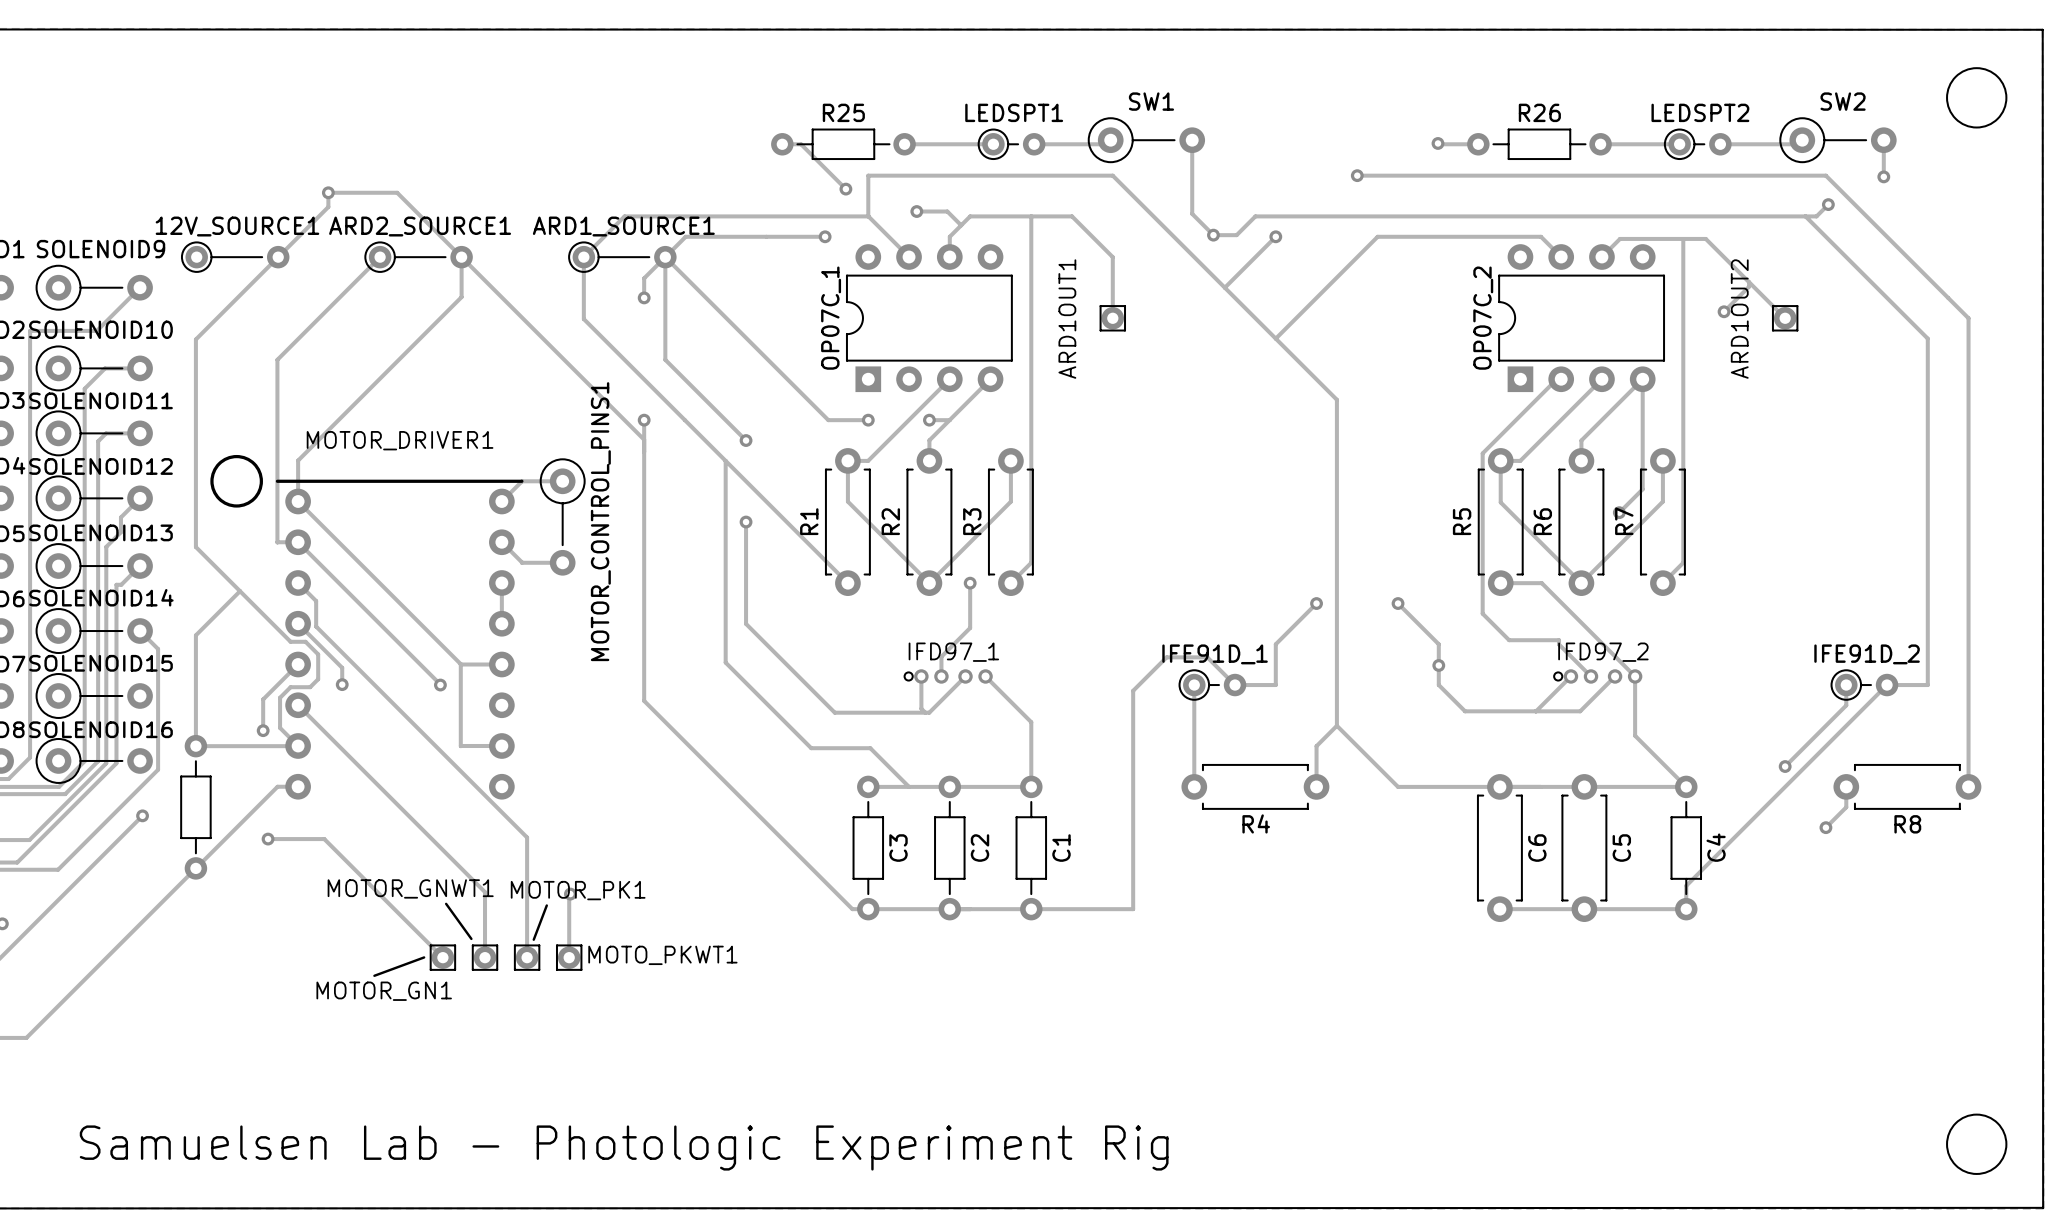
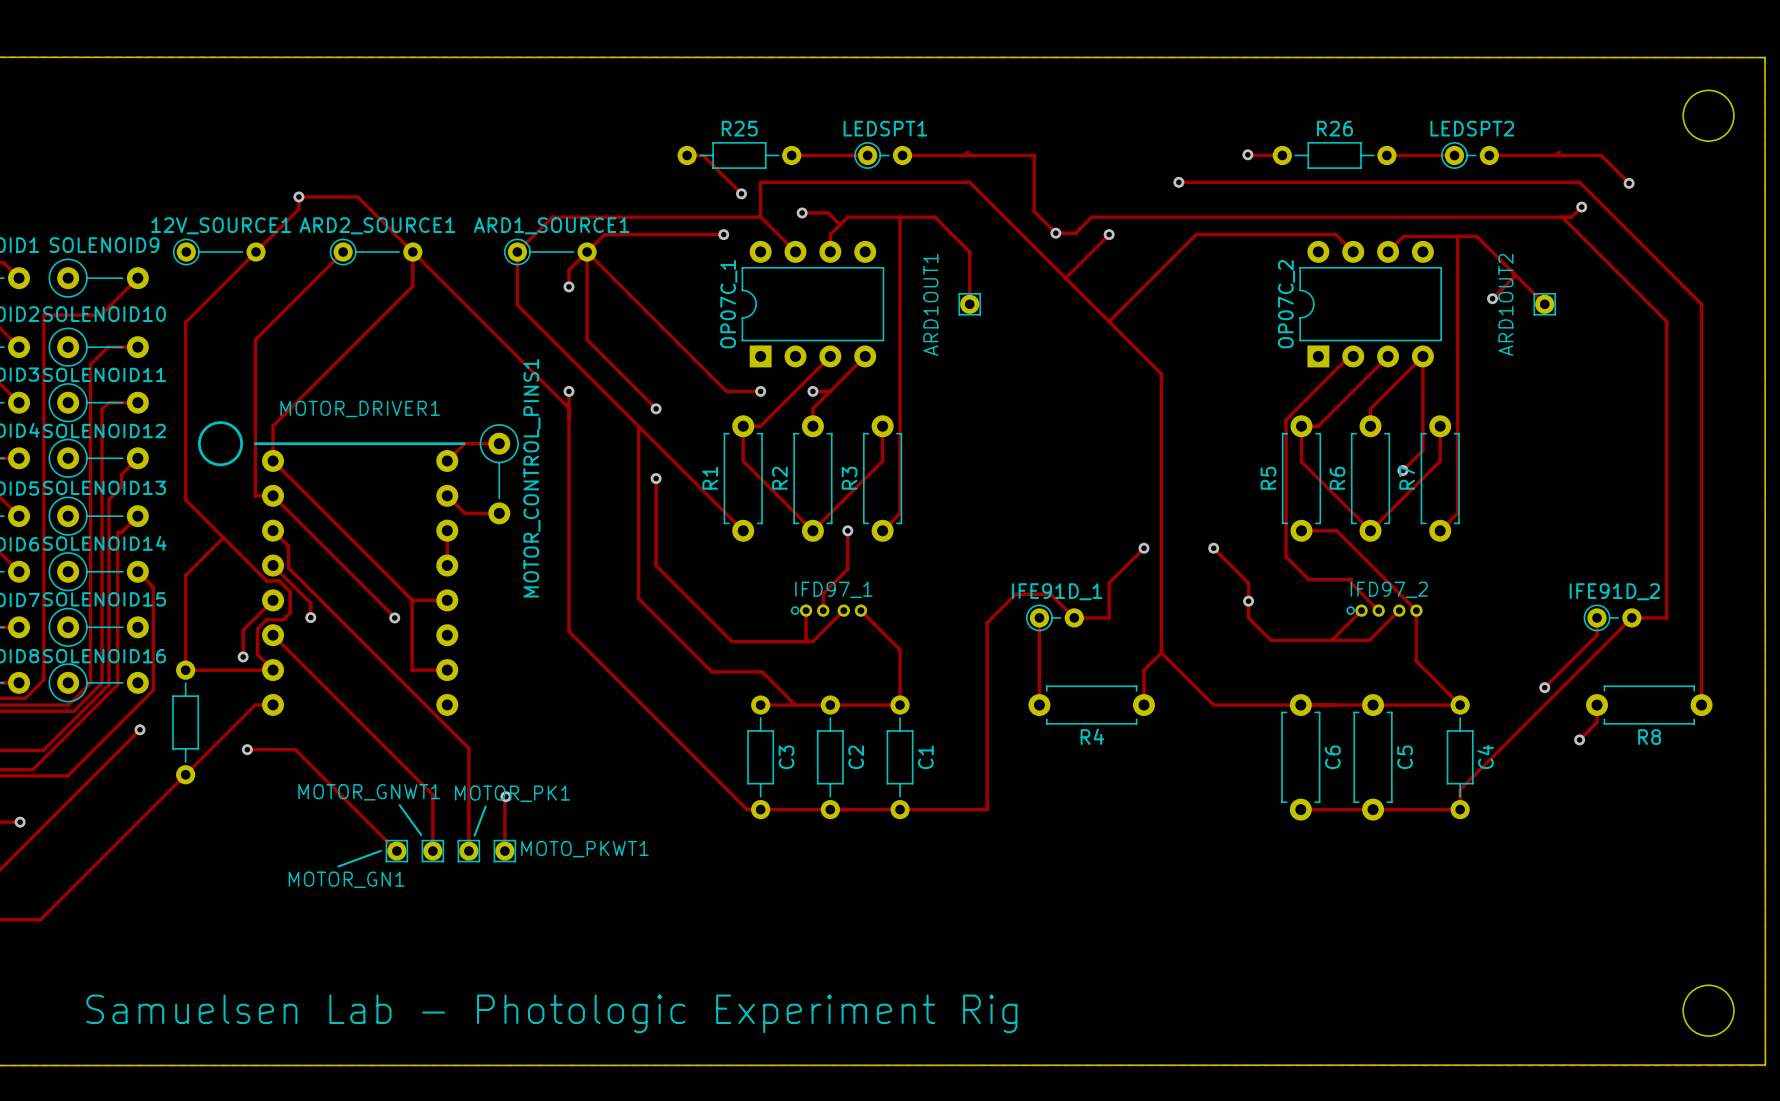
SW1: (1146, 140) -> none
track: (1192, 140) (1192, 213) -> (964, 155) (1034, 155) (1034, 211) (1037, 215)
SW2: (1838, 140) -> none
track: (1883, 140) (1883, 176) -> (1555, 155) (1601, 155) (1629, 183)

